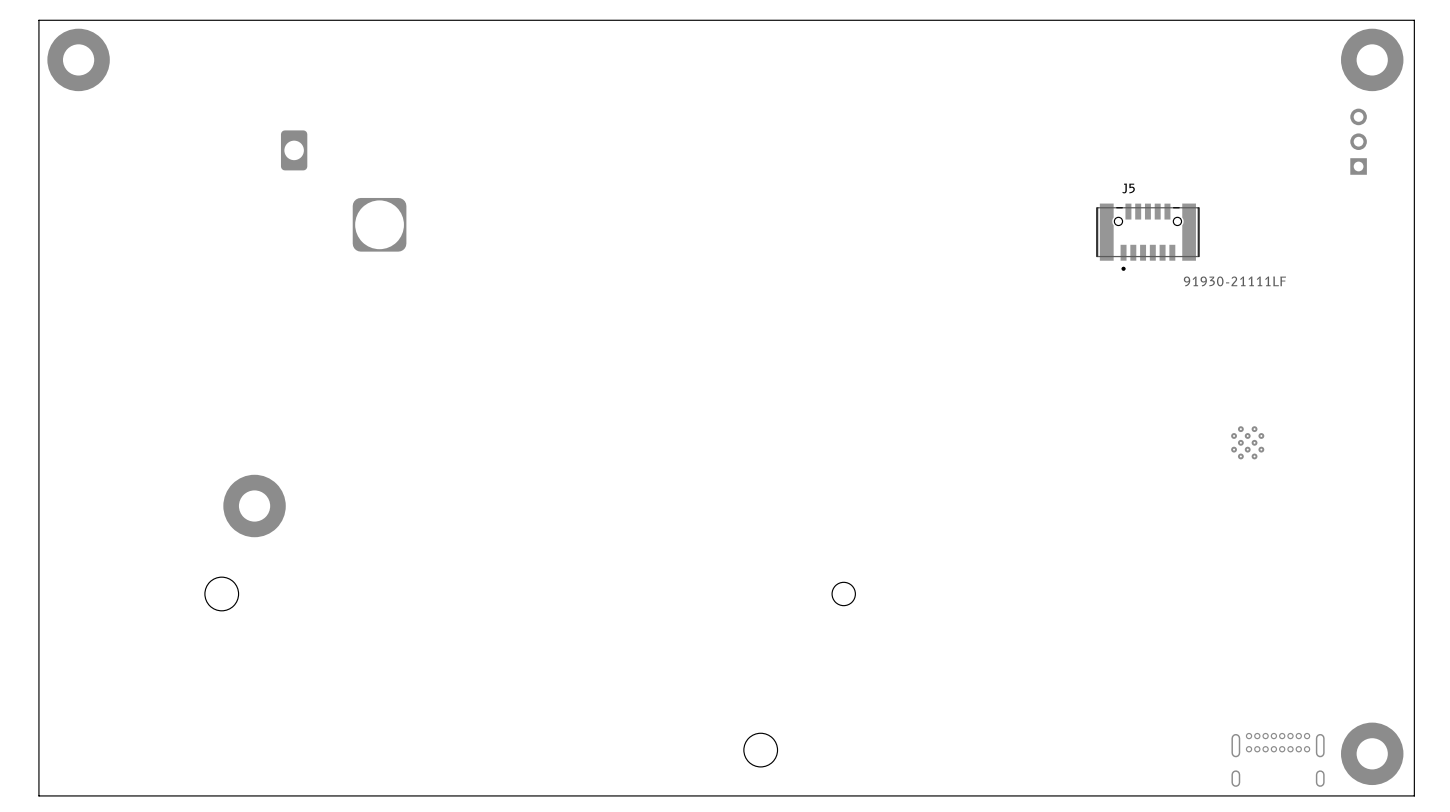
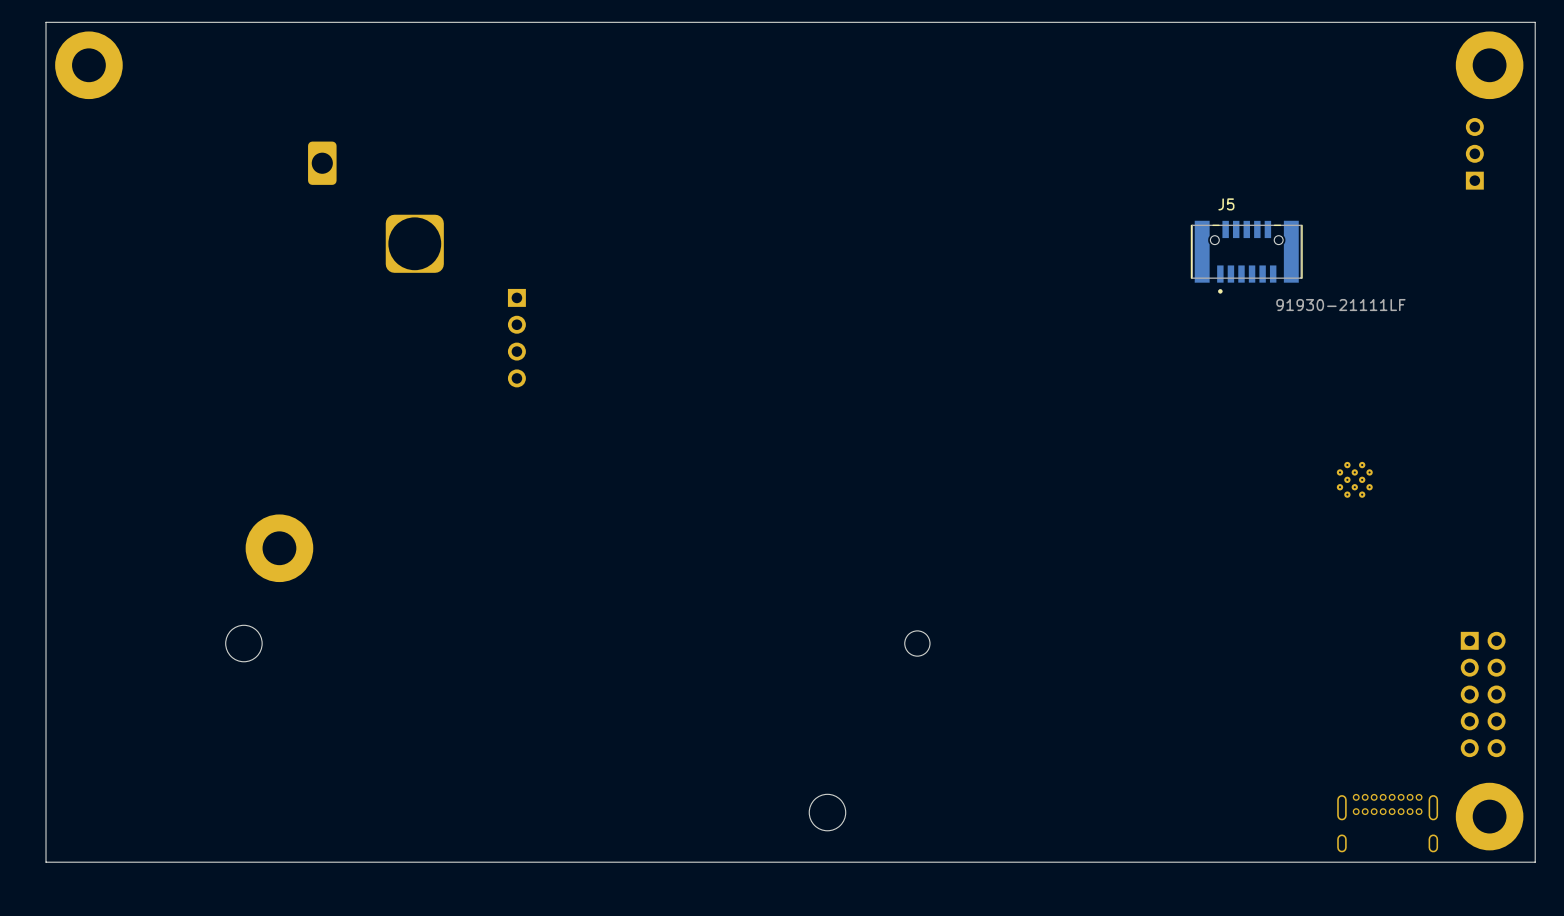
part: none -> (516, 338)
part: none -> (1483, 694)

